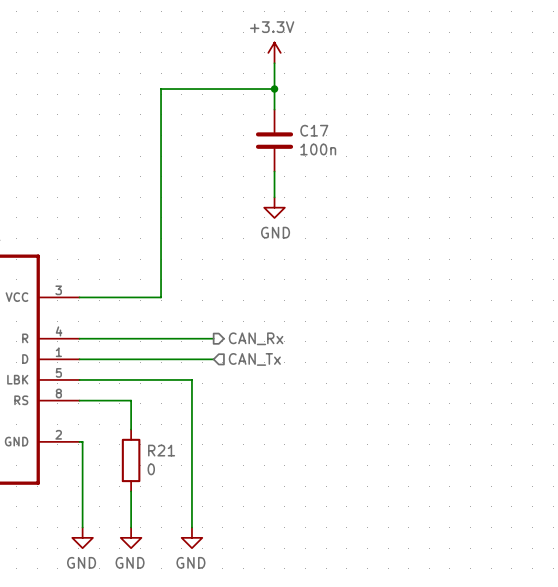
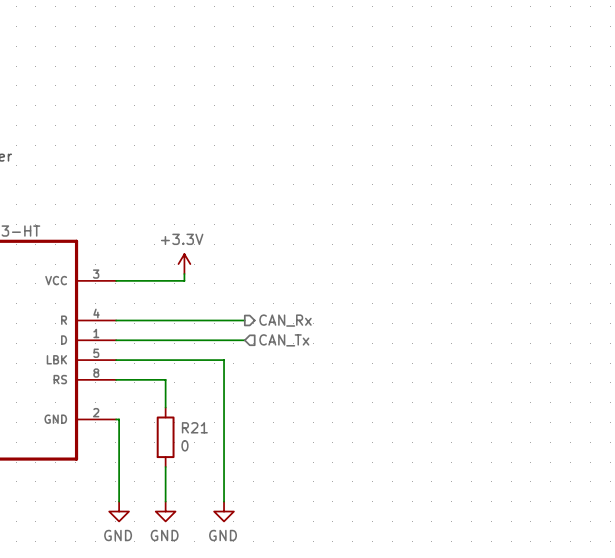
power symbol: +3.3V (274, 52) -> none
wire: (274, 63) (274, 109) -> none
wire: (274, 89) (161, 89) (161, 297) (150, 297) -> (184, 273) (184, 280)
junction: (274, 89) -> none
C17: 100n (274, 140) -> none
wire: (274, 171) (274, 197) -> none
power symbol: GND (274, 207) -> none
power symbol: none -> +3.3V (184, 264)

